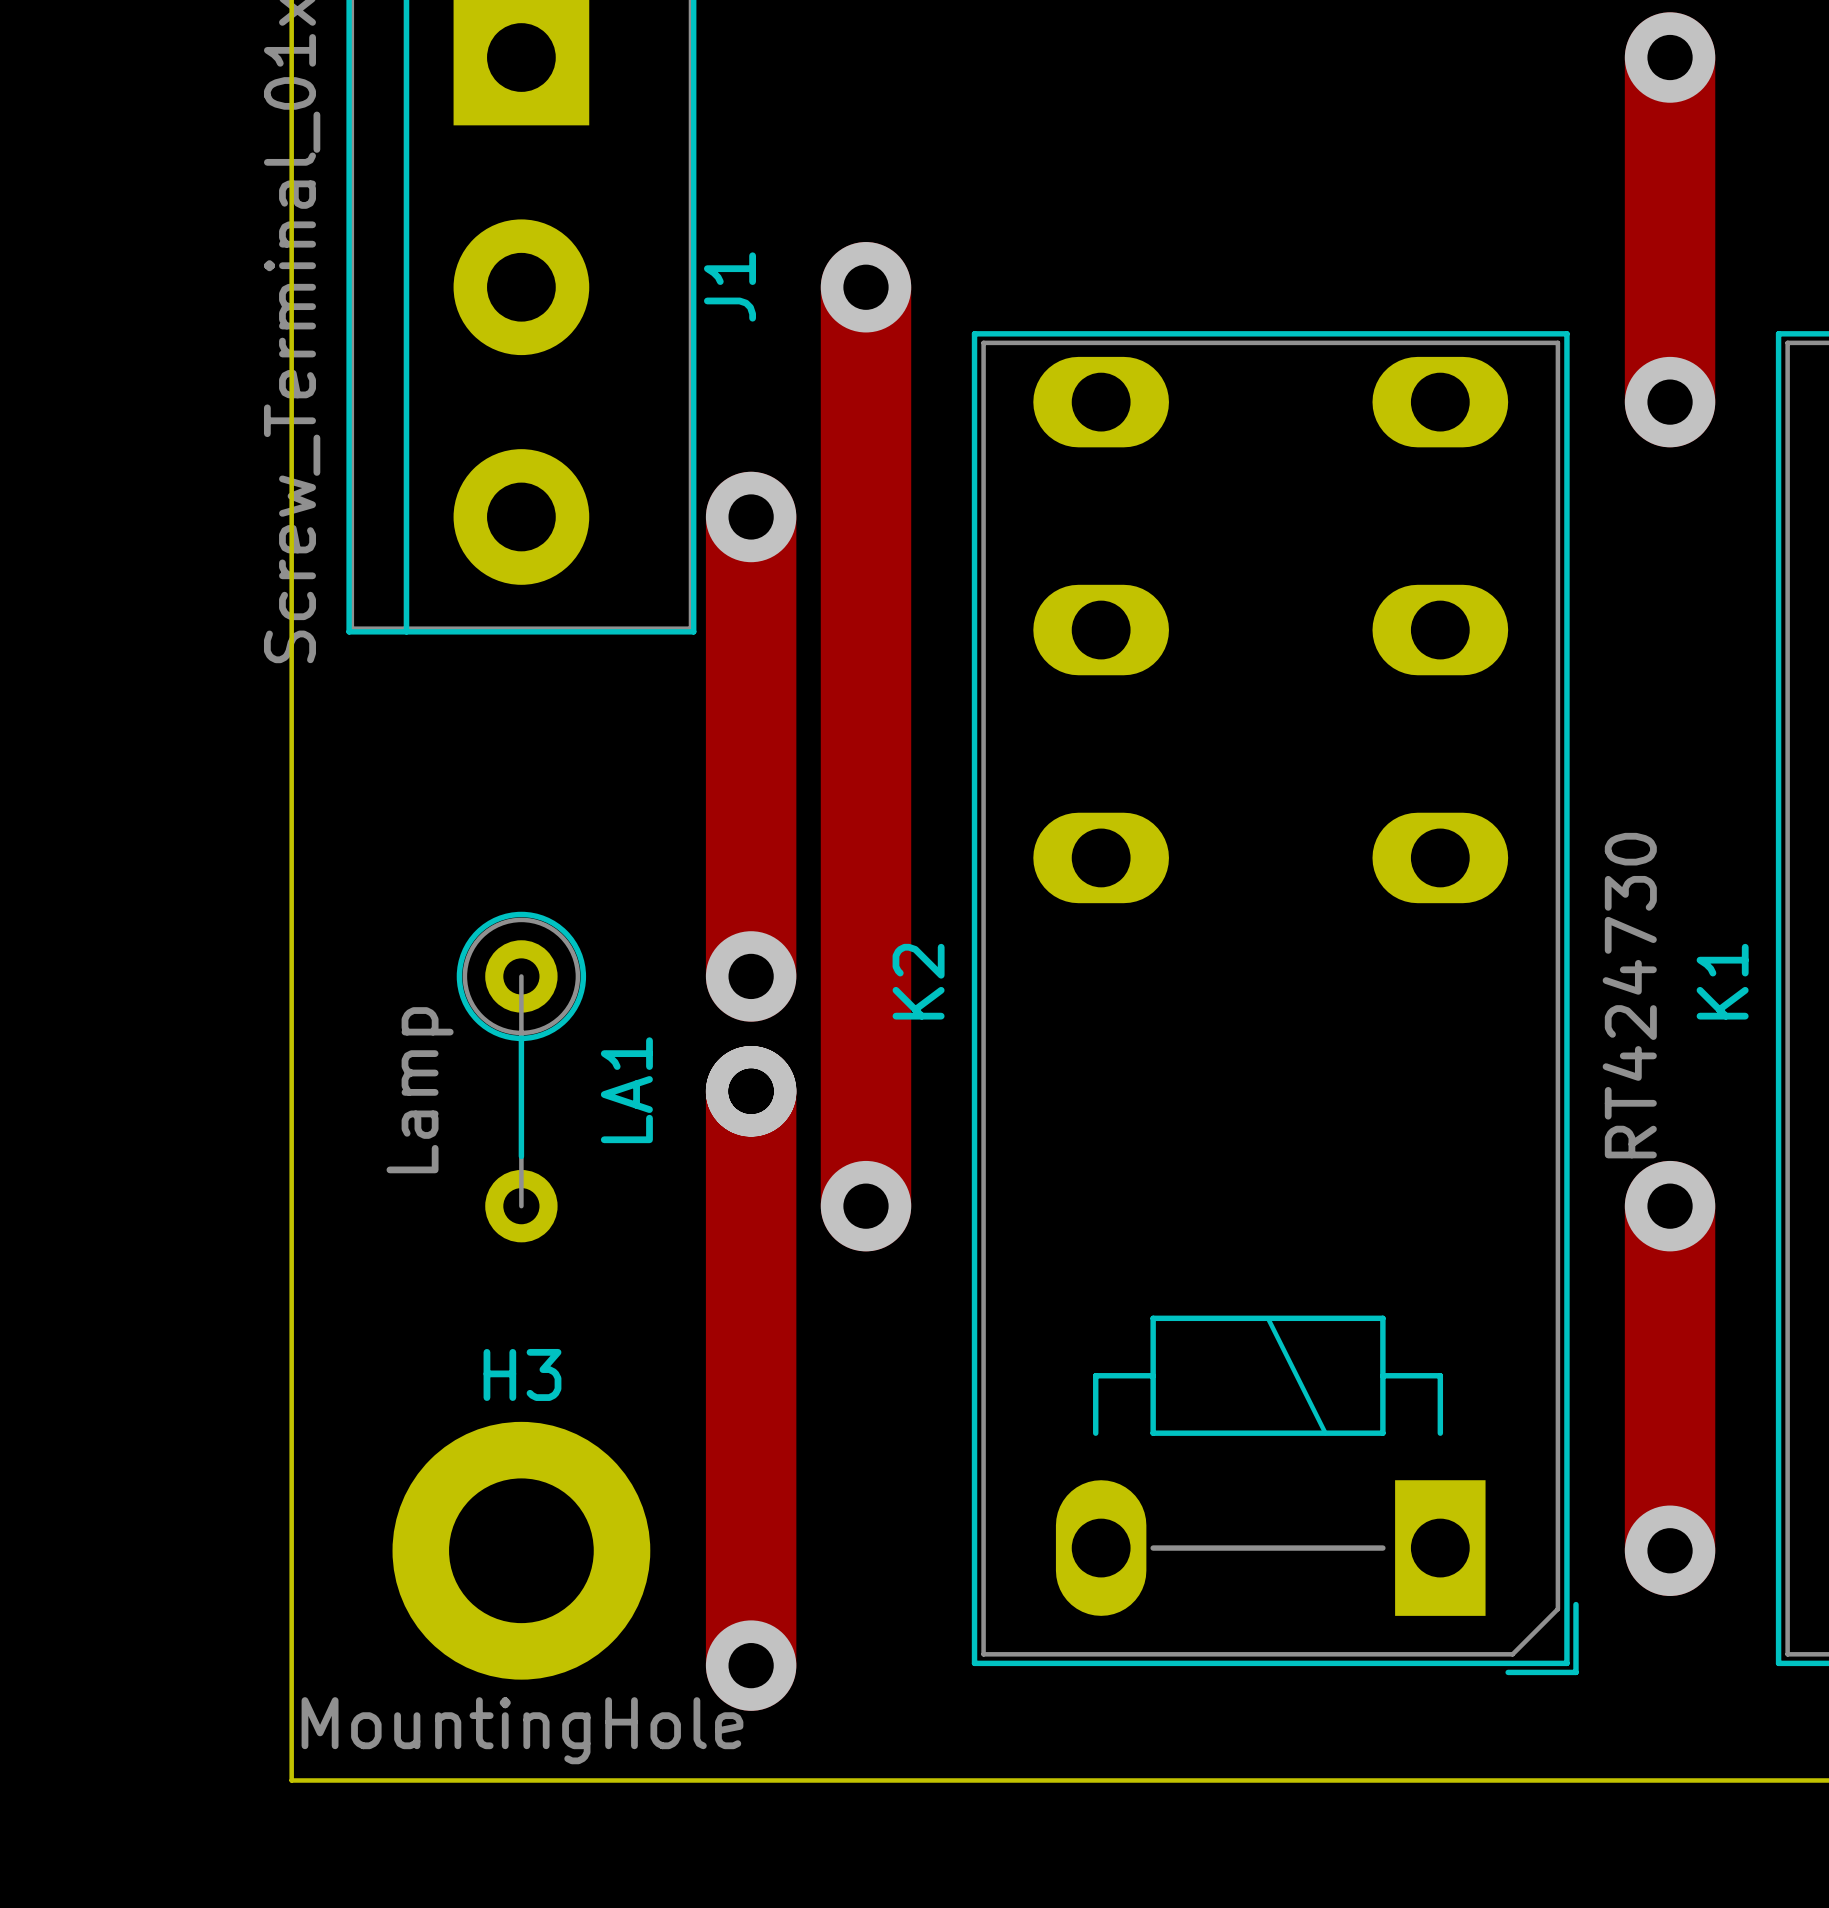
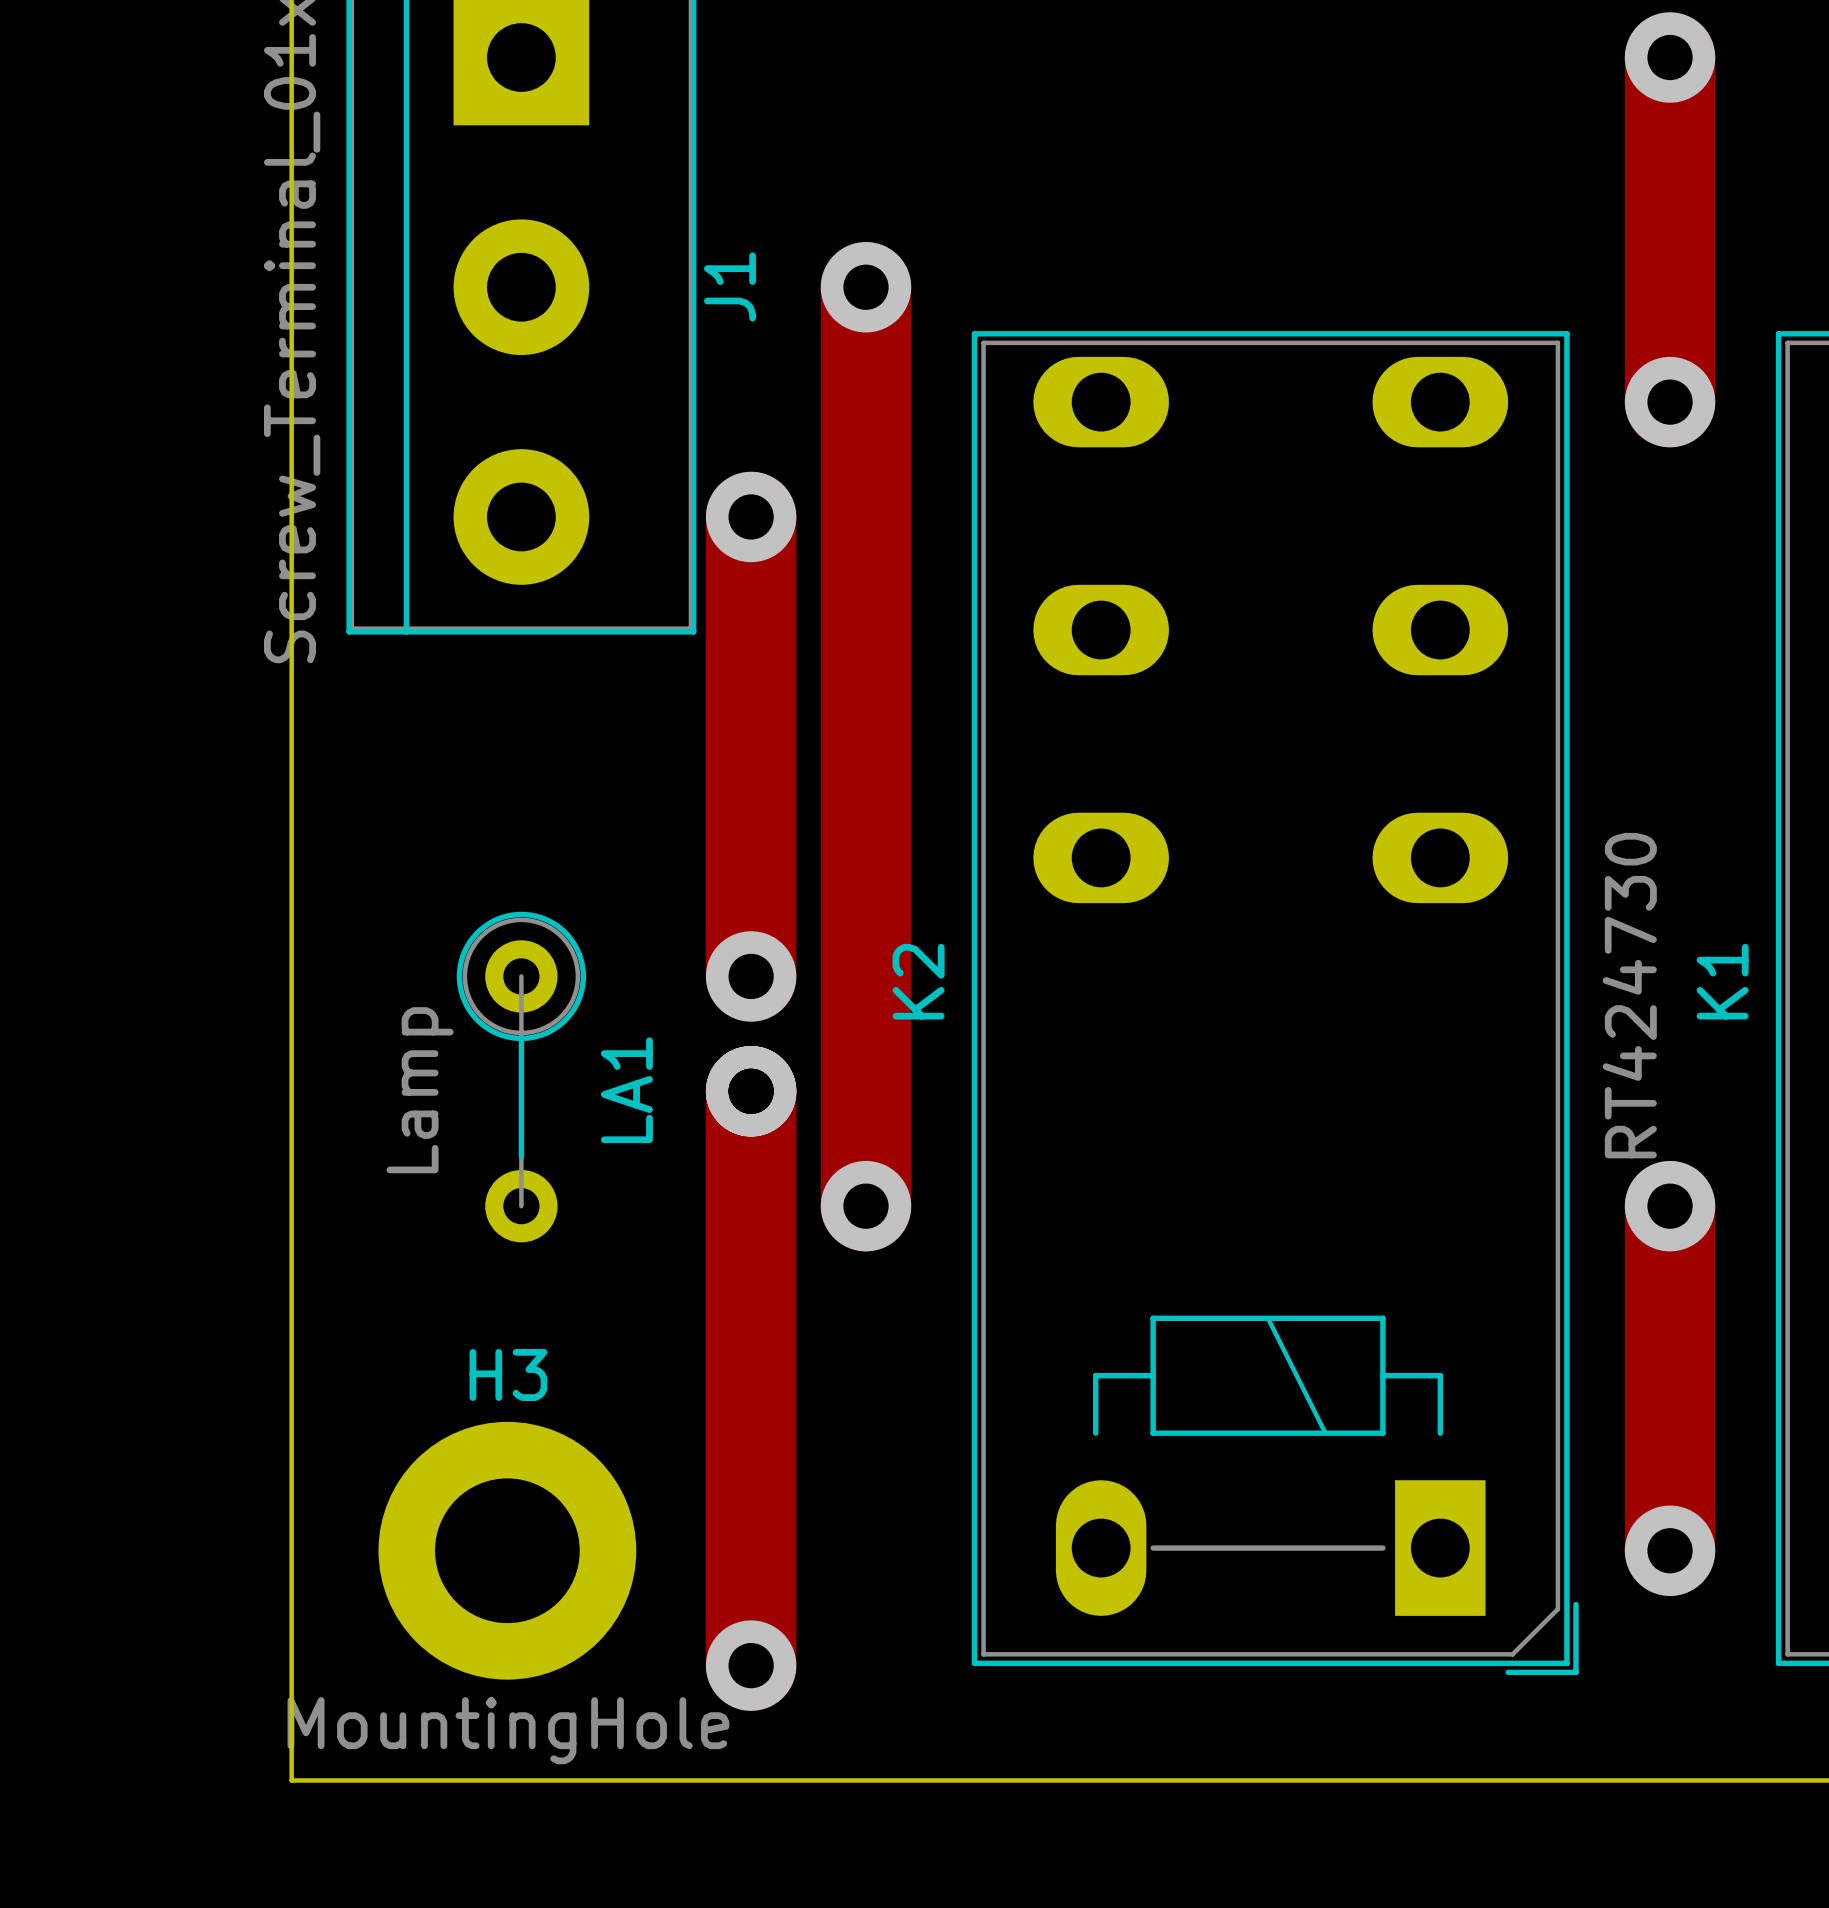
H3 position: (521, 1550) -> (507, 1550)

